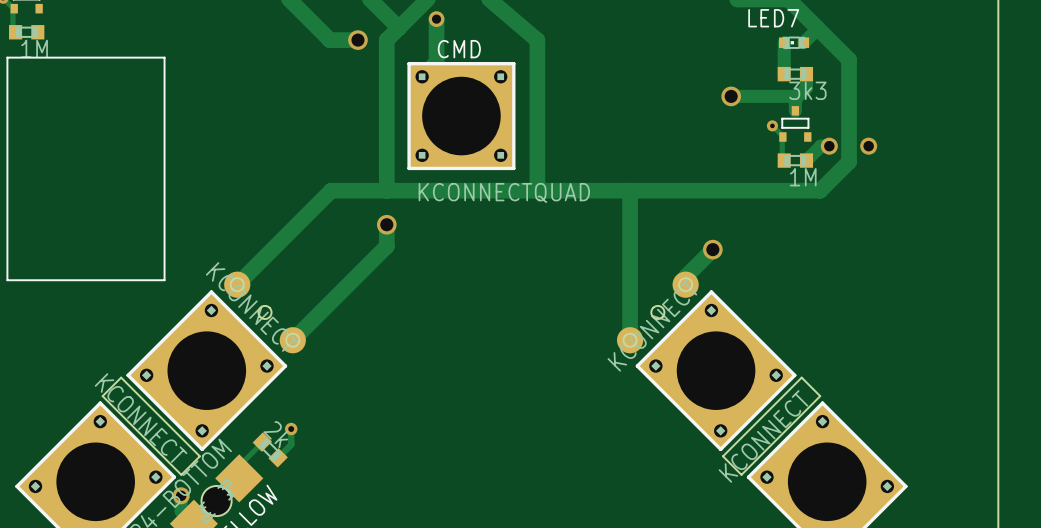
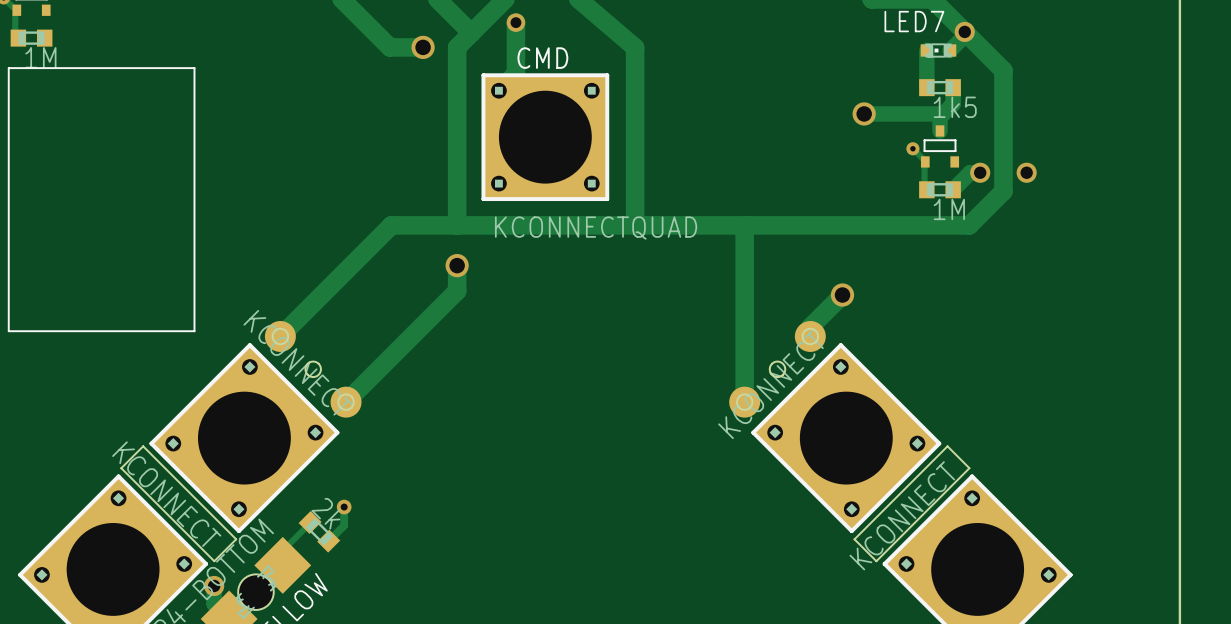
via: none -> (964, 31)
part value: 3k3 (807, 90) -> 1k5 (955, 107)

